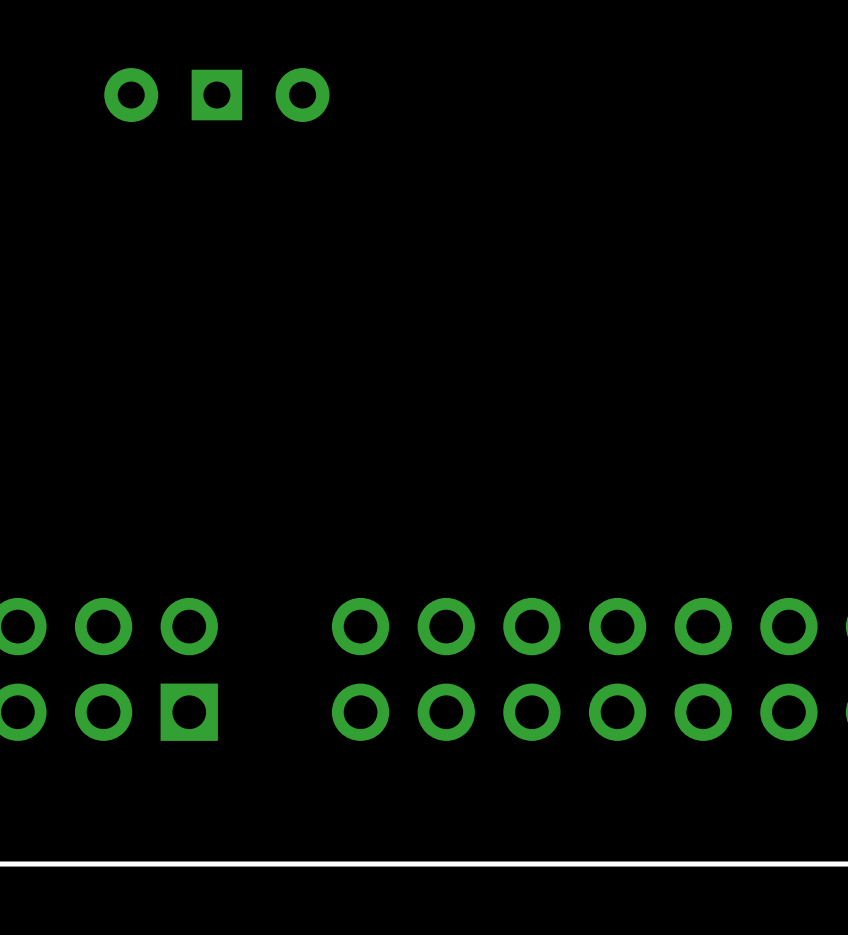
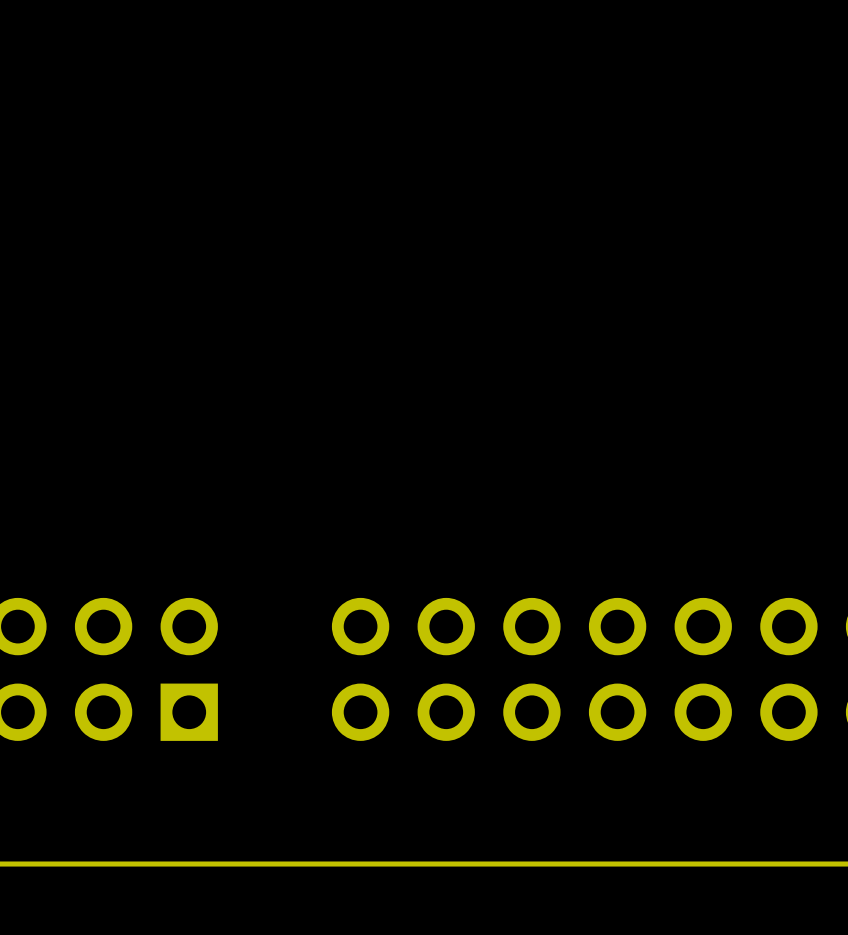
part: (216, 95) -> none

